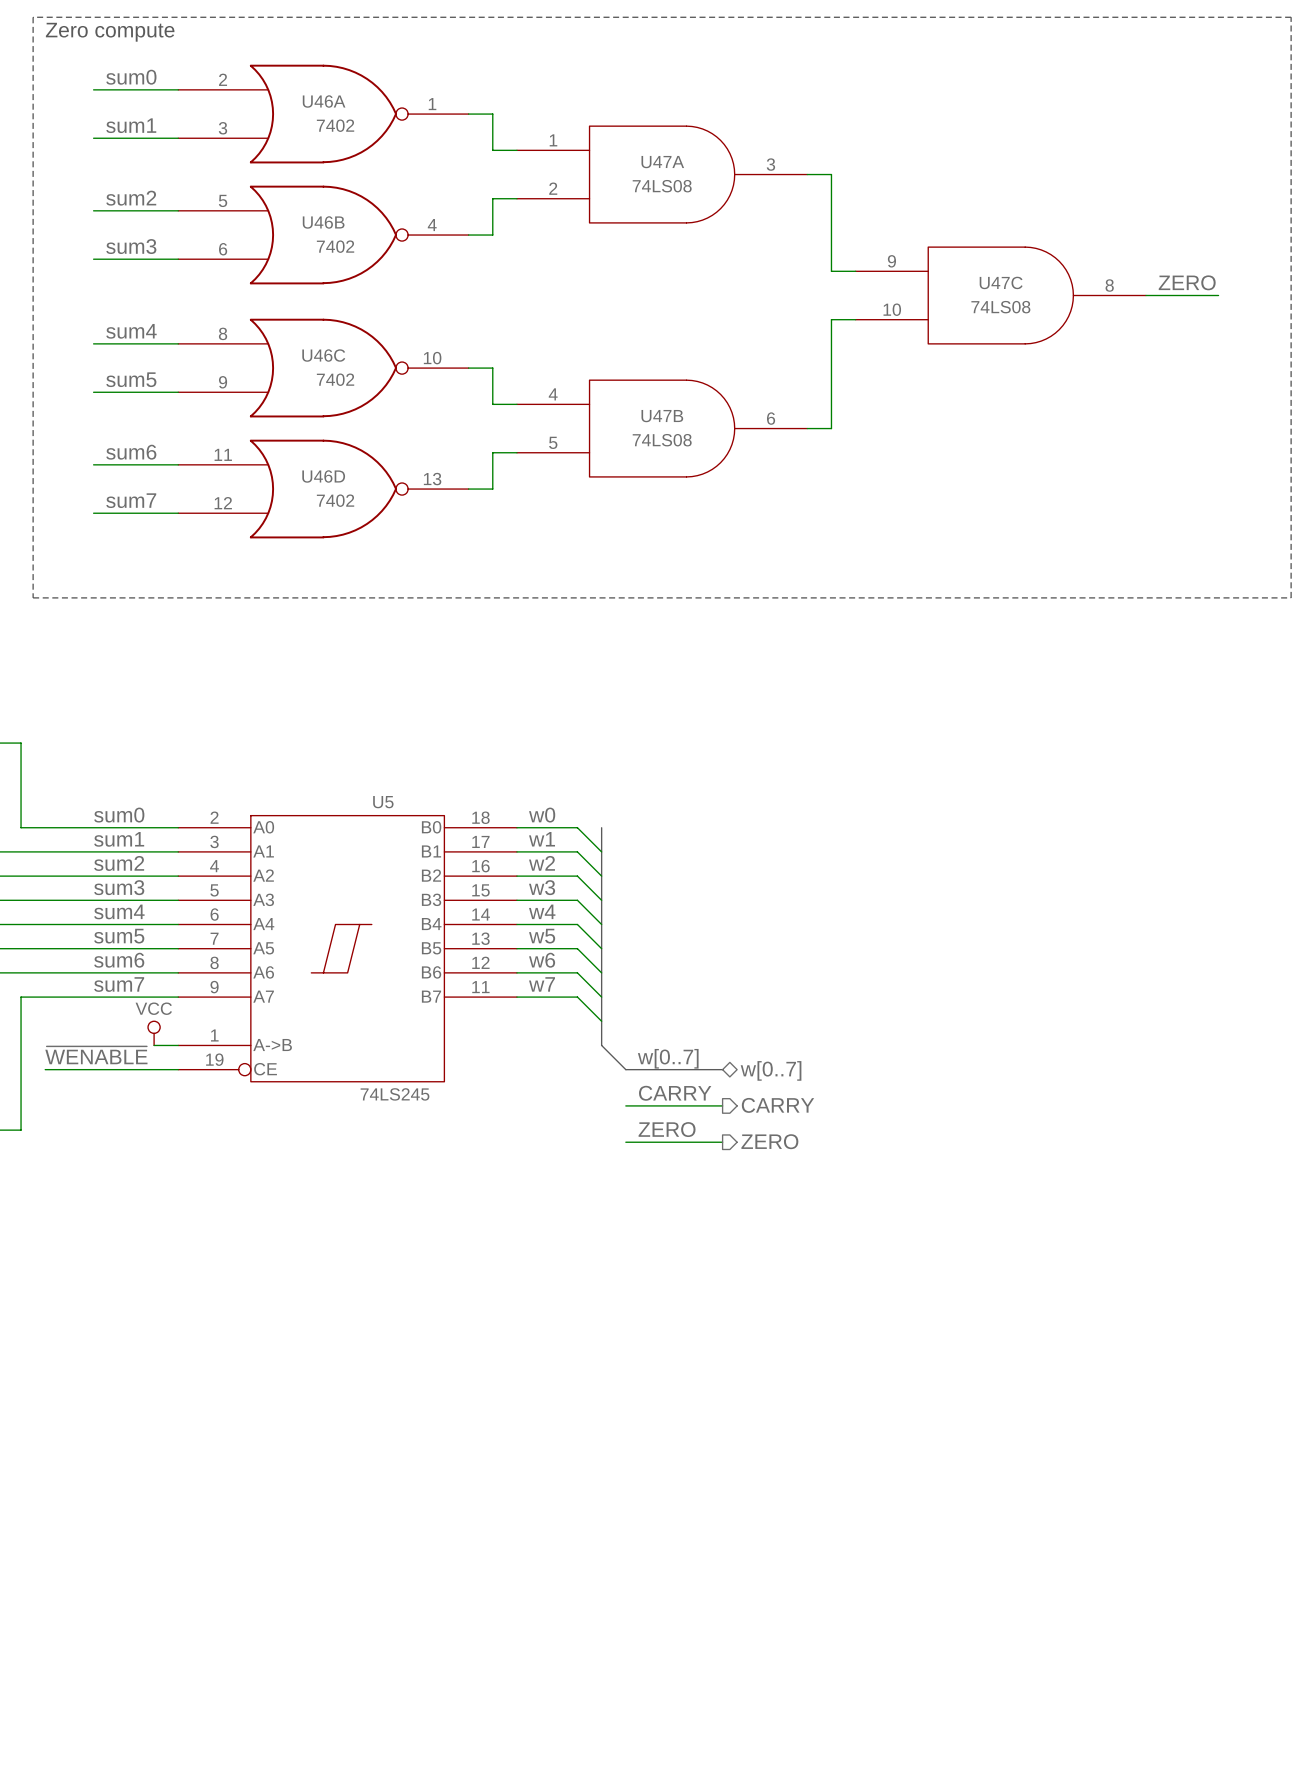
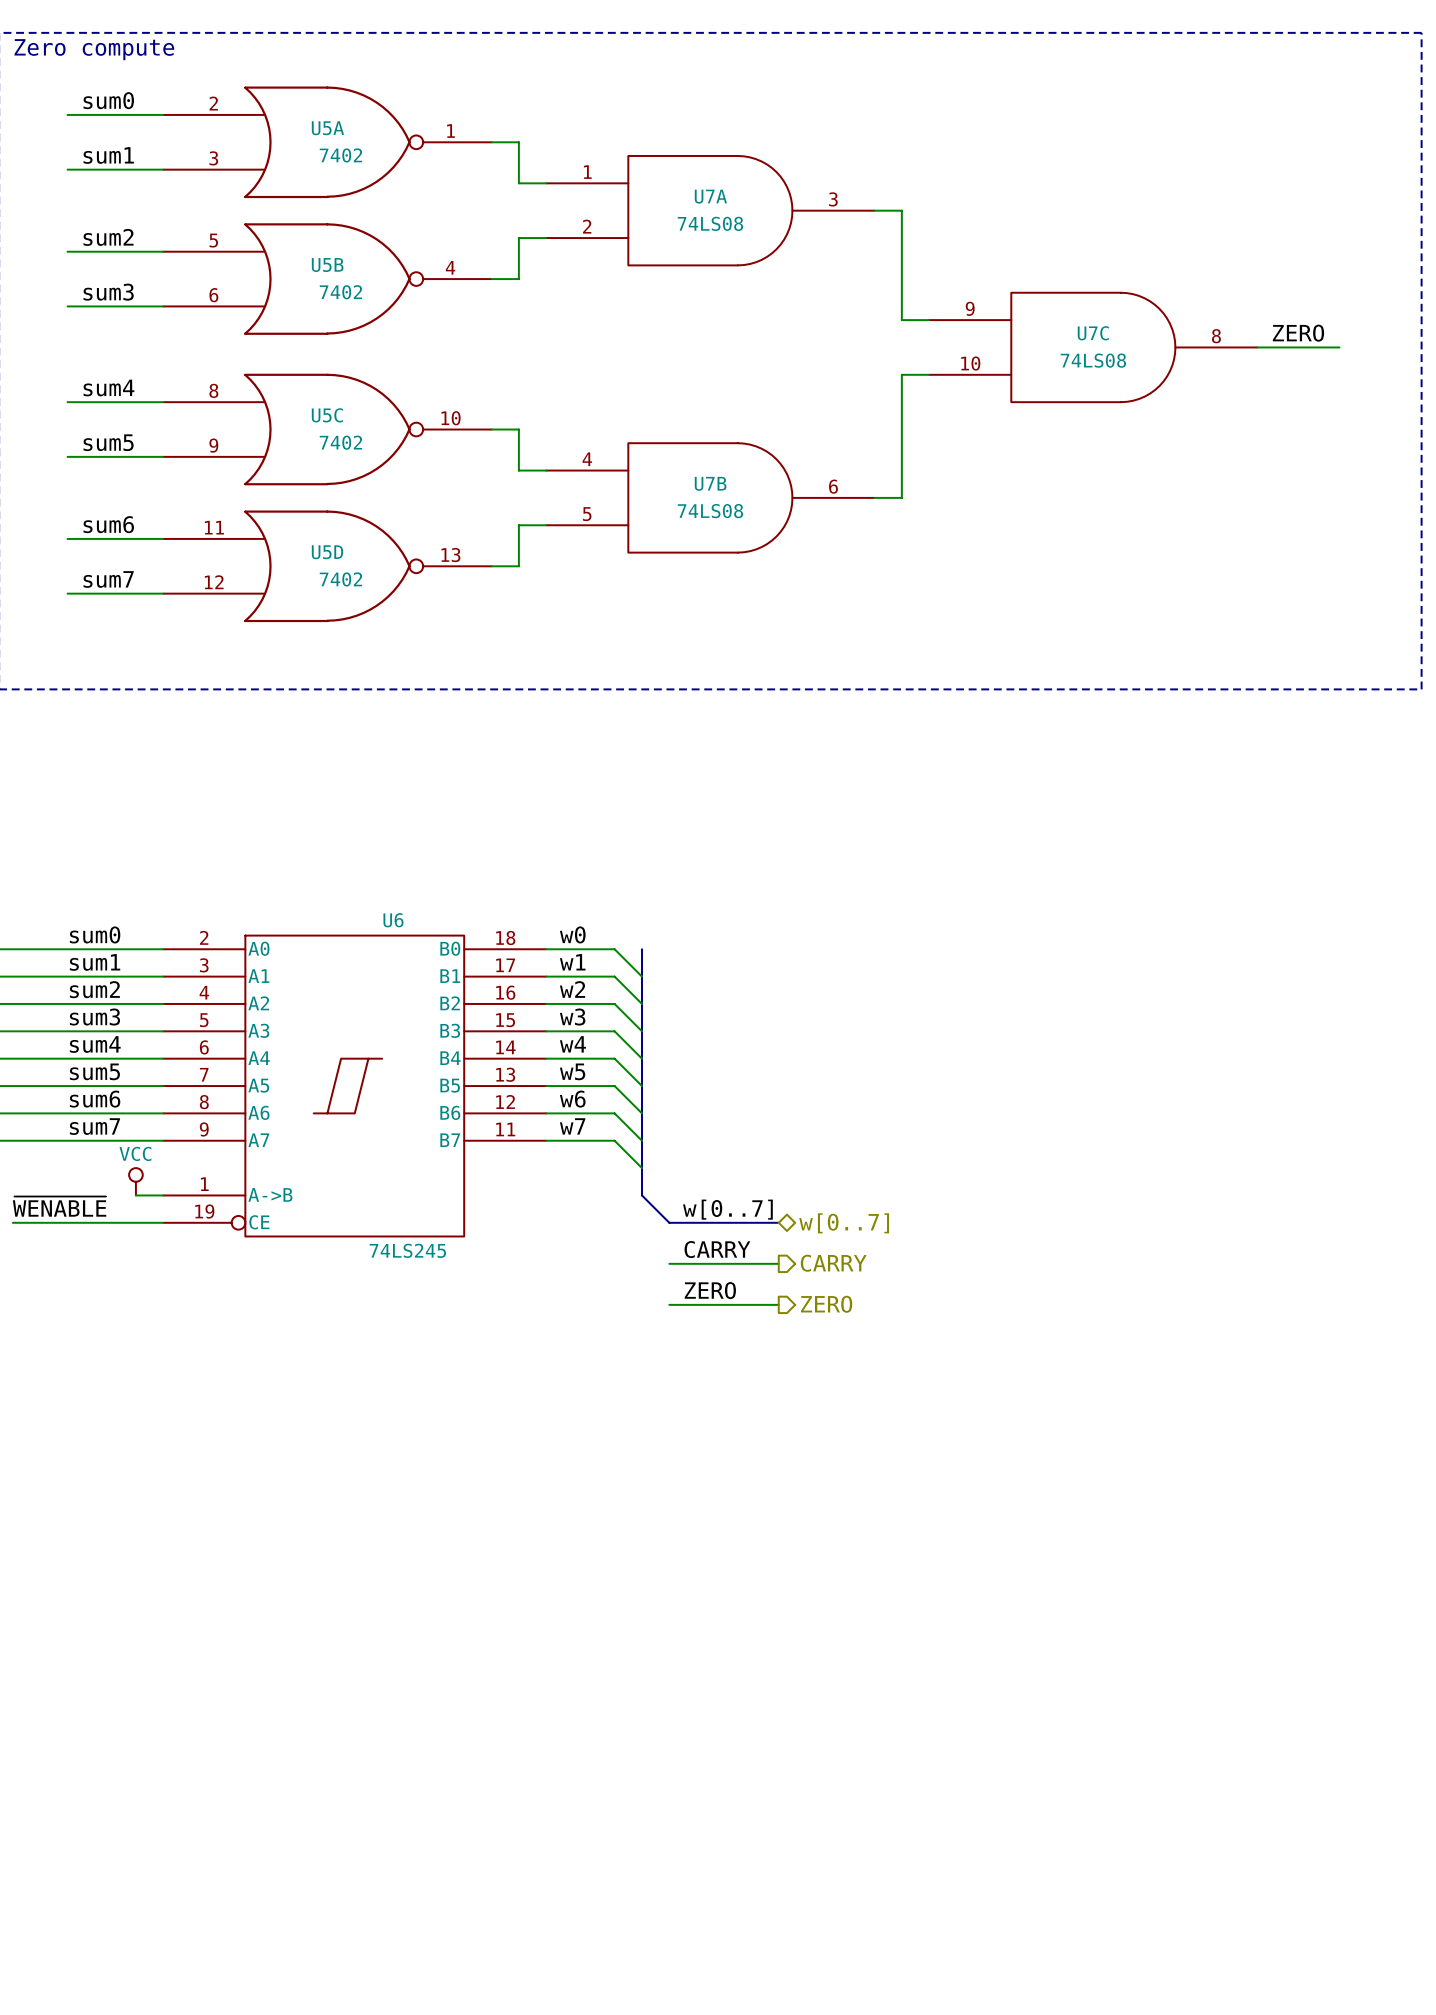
U46A name: U46A (324, 101) -> U5A (327, 128)
U47A name: U47A (662, 162) -> U7A (710, 196)
U46B name: U46B (323, 222) -> U5B (327, 265)
U47C name: U47C (1001, 282) -> U7C (1093, 333)
U46C name: U46C (323, 355) -> U5C (327, 415)
U47B name: U47B (662, 416) -> U7B (710, 483)
U46D name: U46D (323, 476) -> U5D (327, 552)
U5 name: U5 (383, 802) -> U6 (393, 920)

